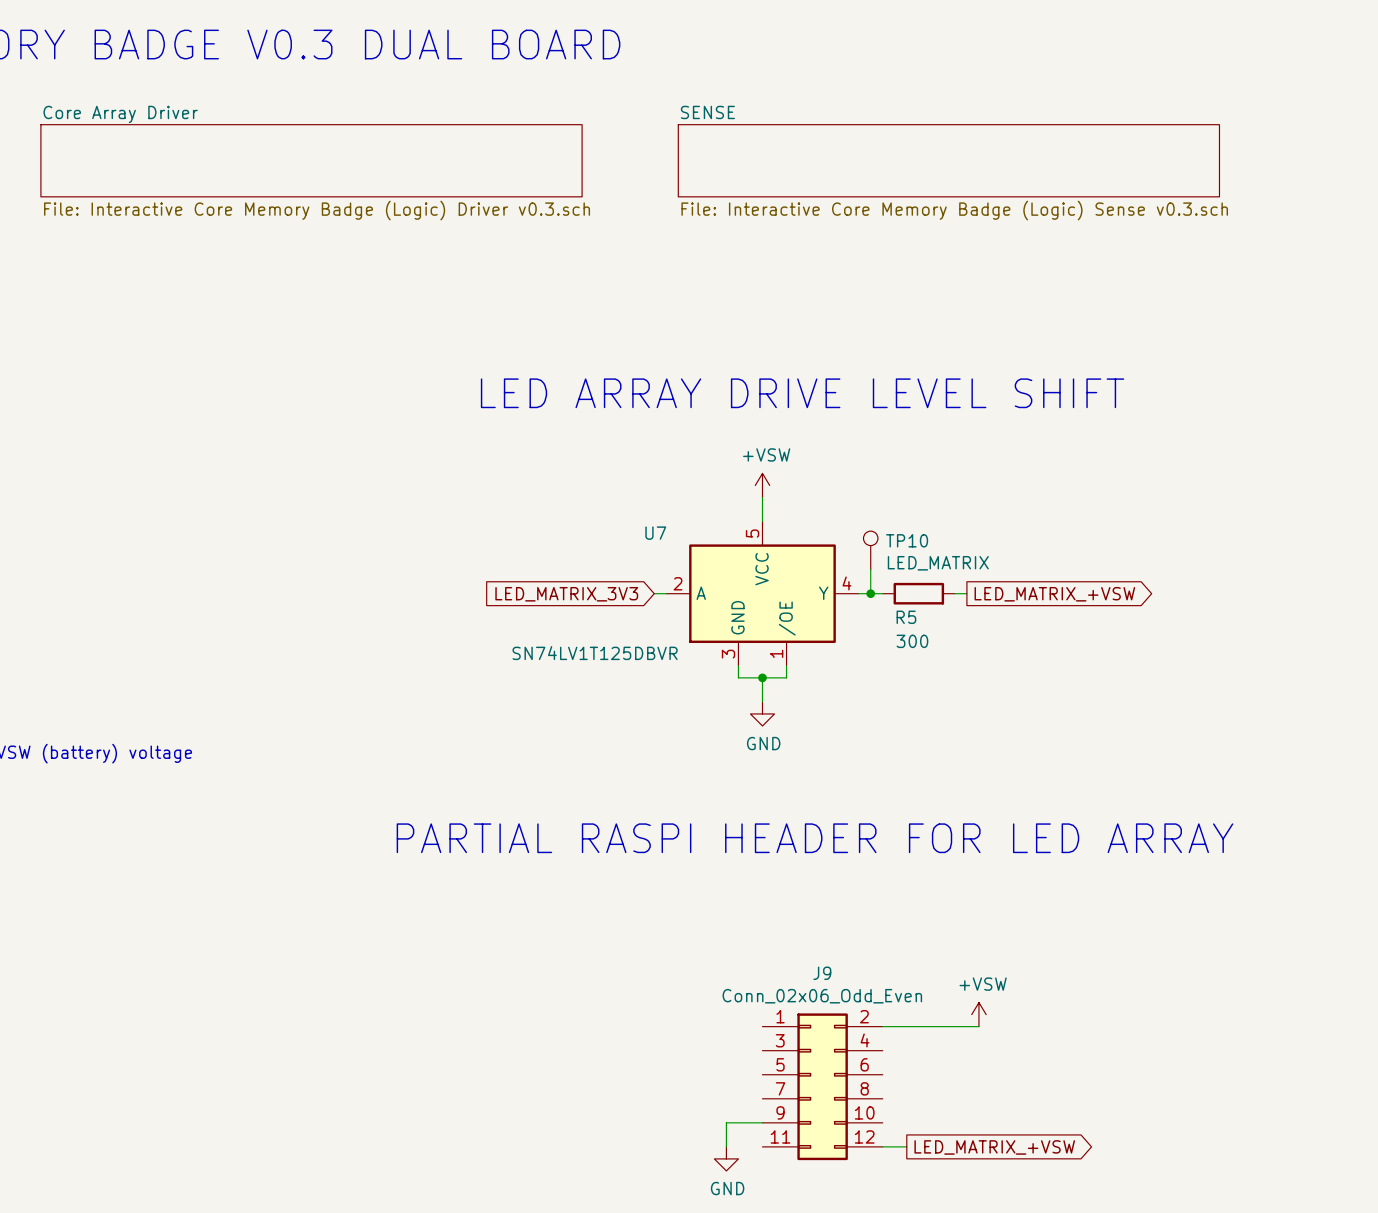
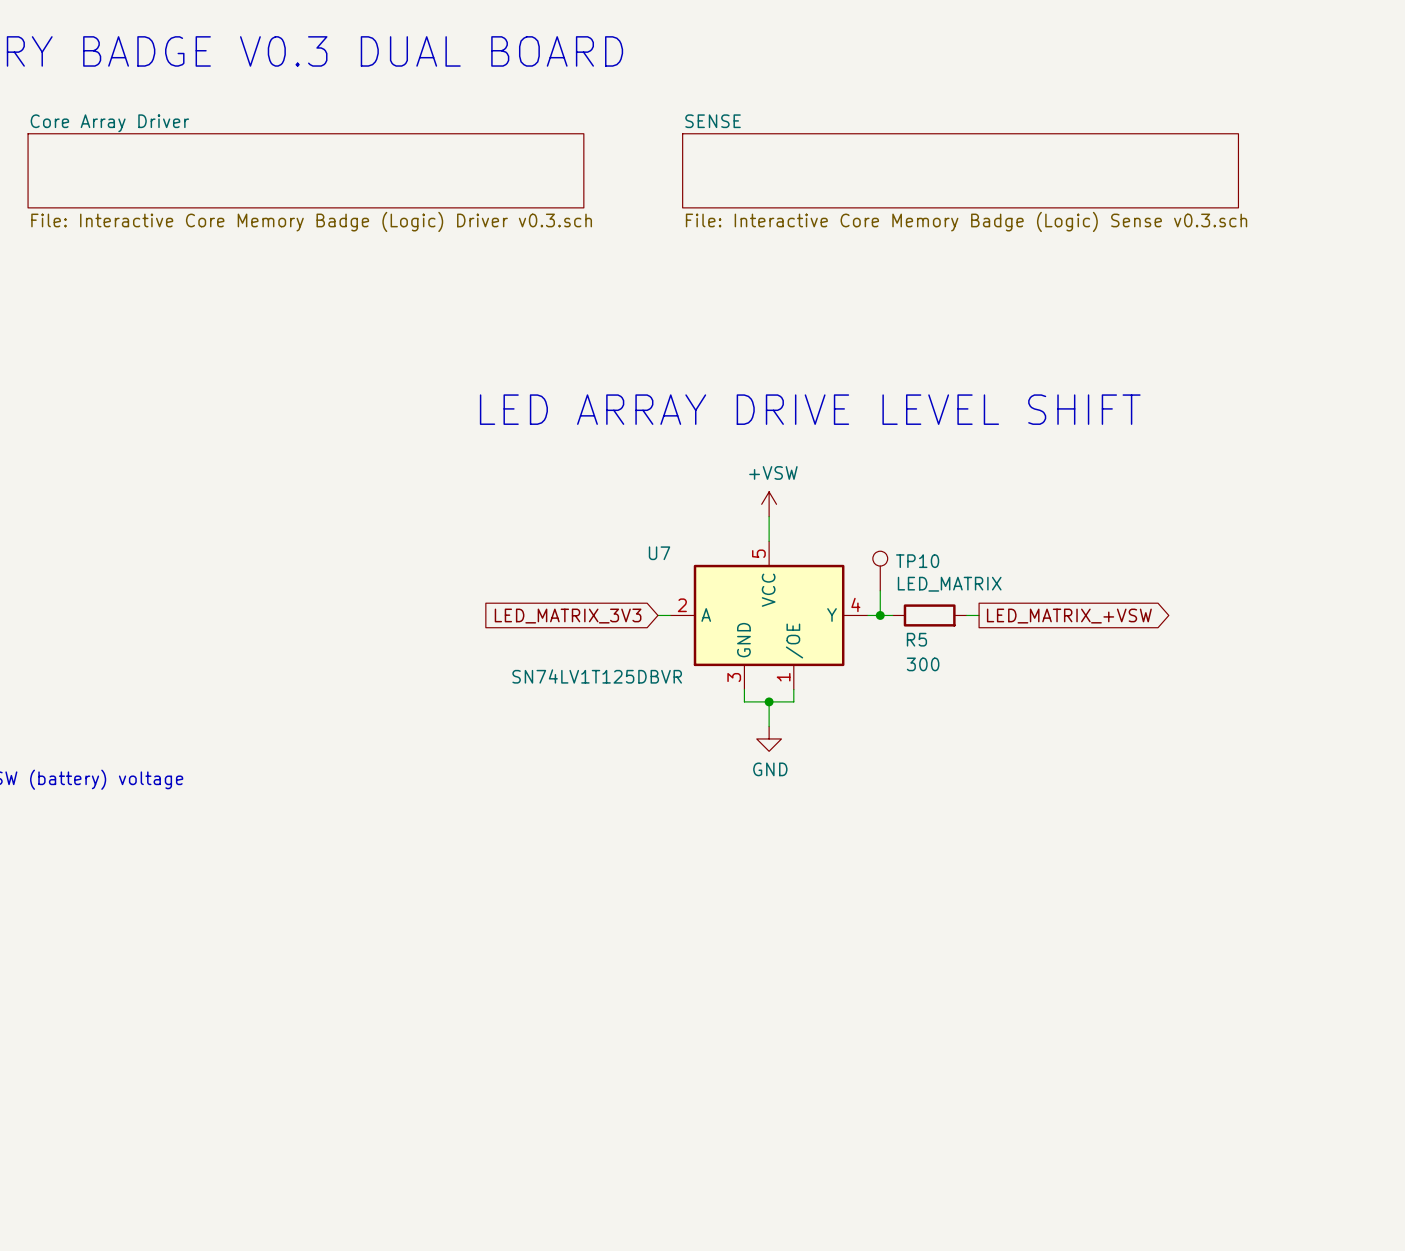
text: PARTIAL RASPI HEADER FOR LED ARRAY (814, 838) -> none
power symbol: +VSW (978, 1014) -> none
wire: (882, 1026) (978, 1026) -> none
J9: Conn_02x06_Odd_Even (822, 1086) -> none
wire: (762, 1122) (726, 1122) (726, 1146) -> none
wire: (882, 1146) (906, 1146) -> none
global label: LED_MATRIX_+VSW (994, 1147) -> none
power symbol: GND (726, 1158) -> none

